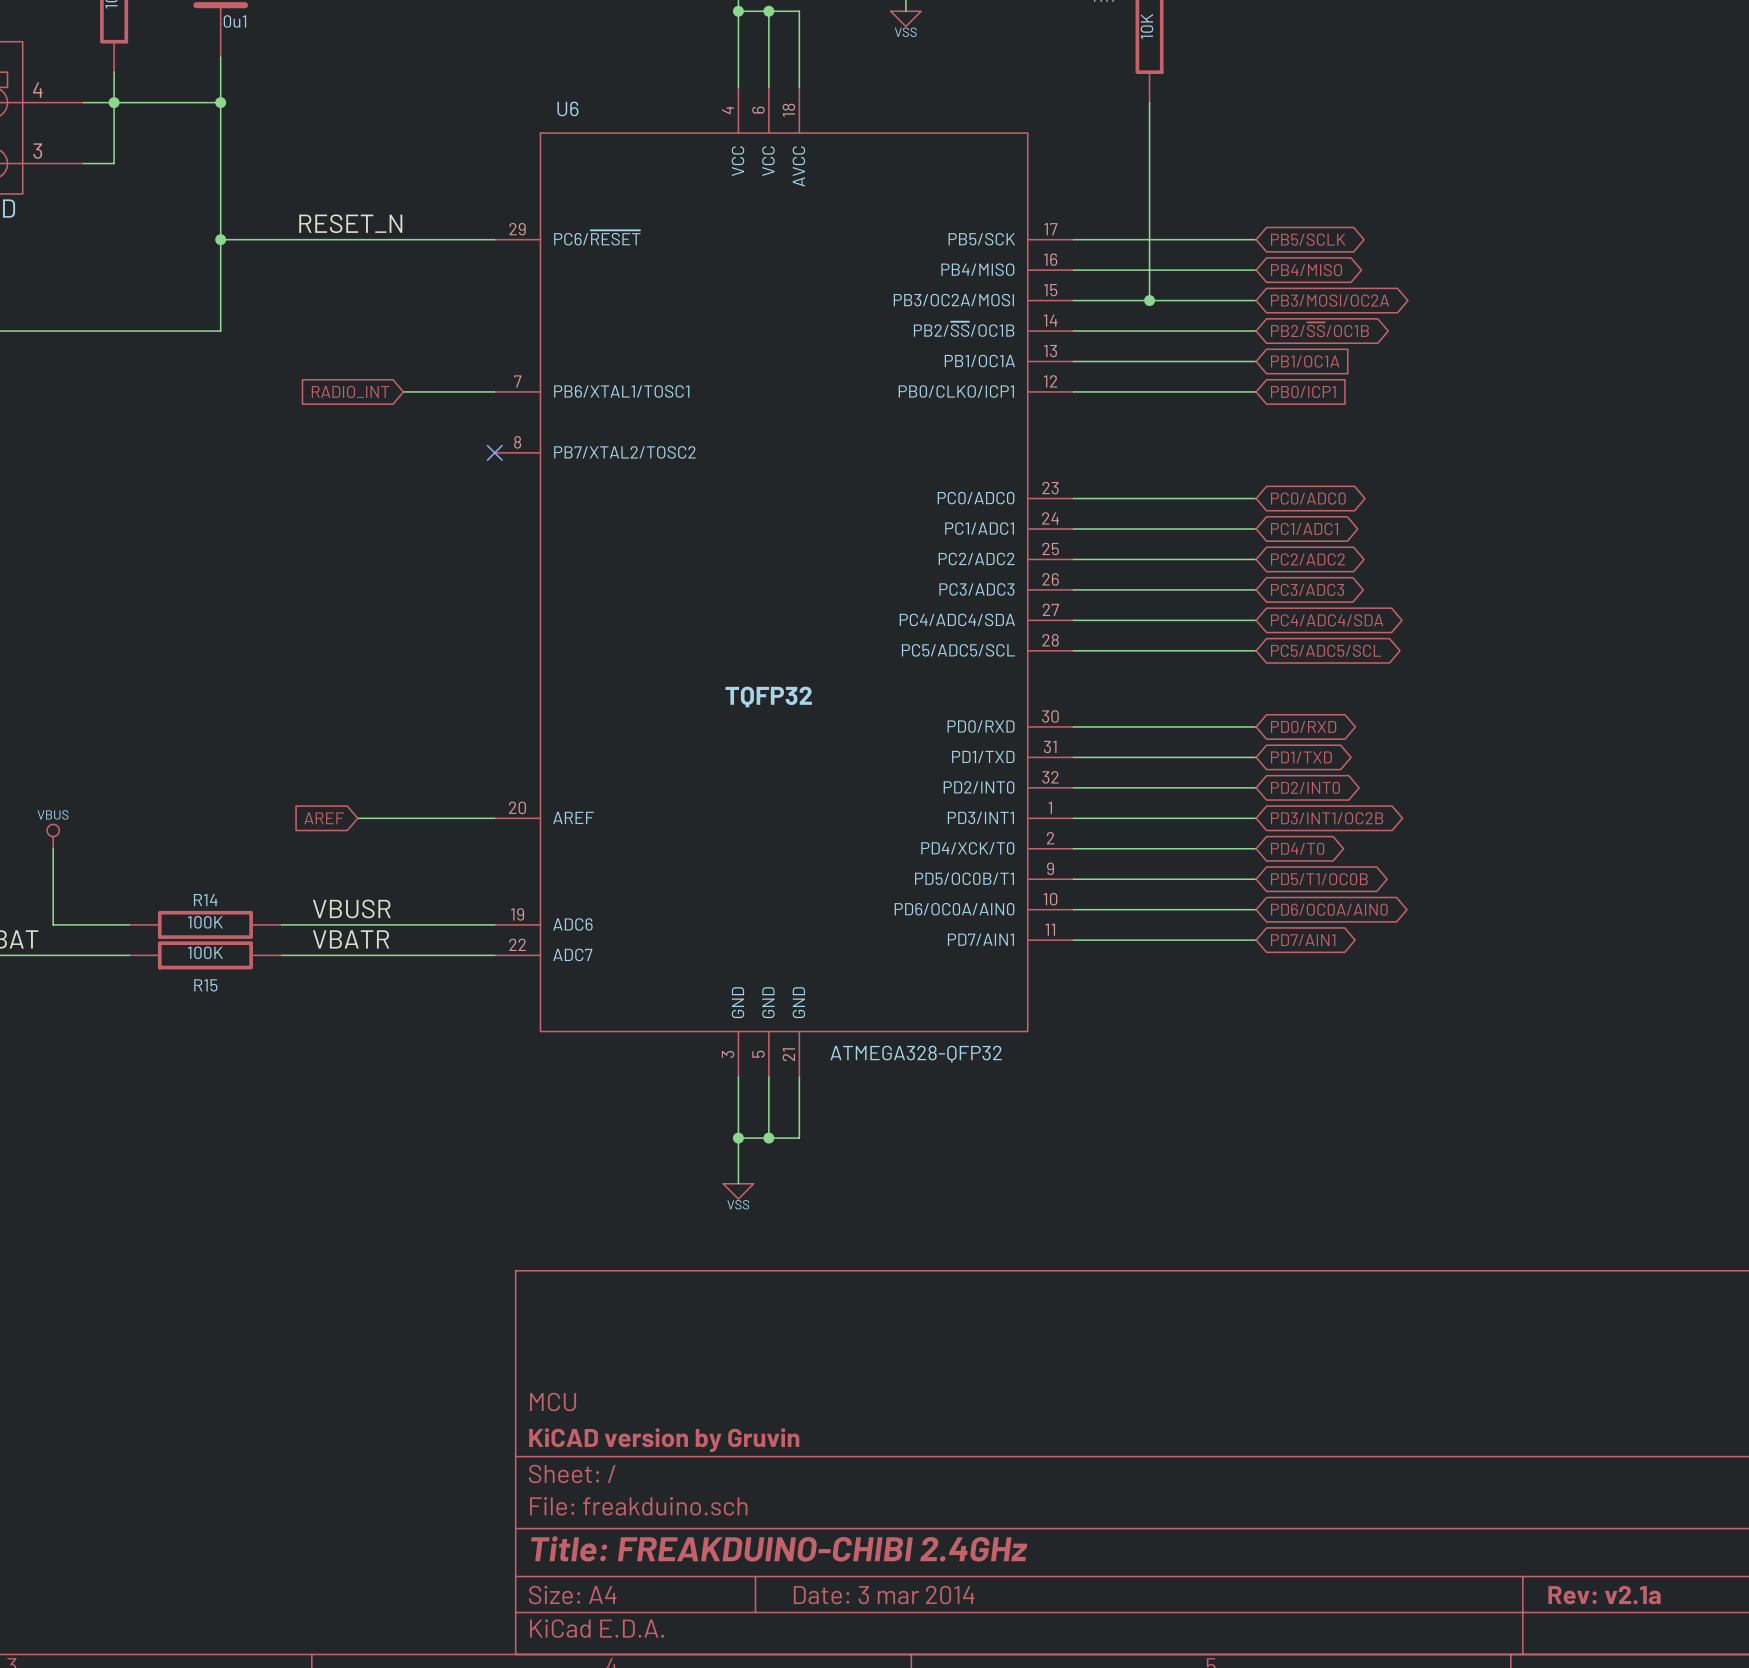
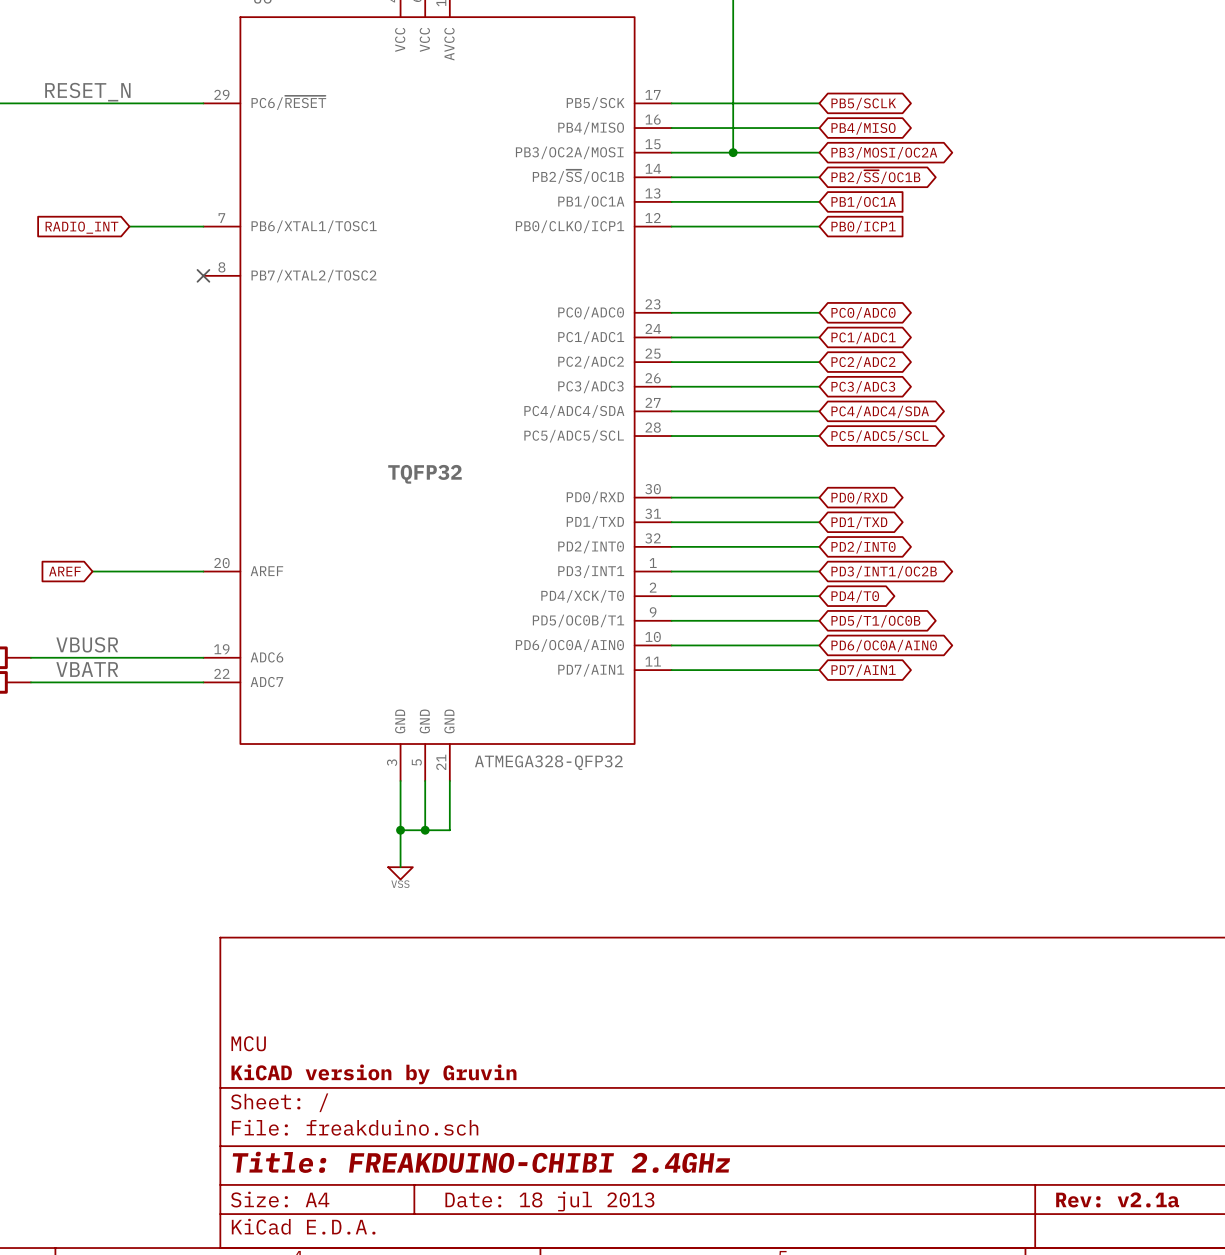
title block: Date: 3 mar 2014 (884, 1595) -> Date: 18 jul 2013 (549, 1201)

